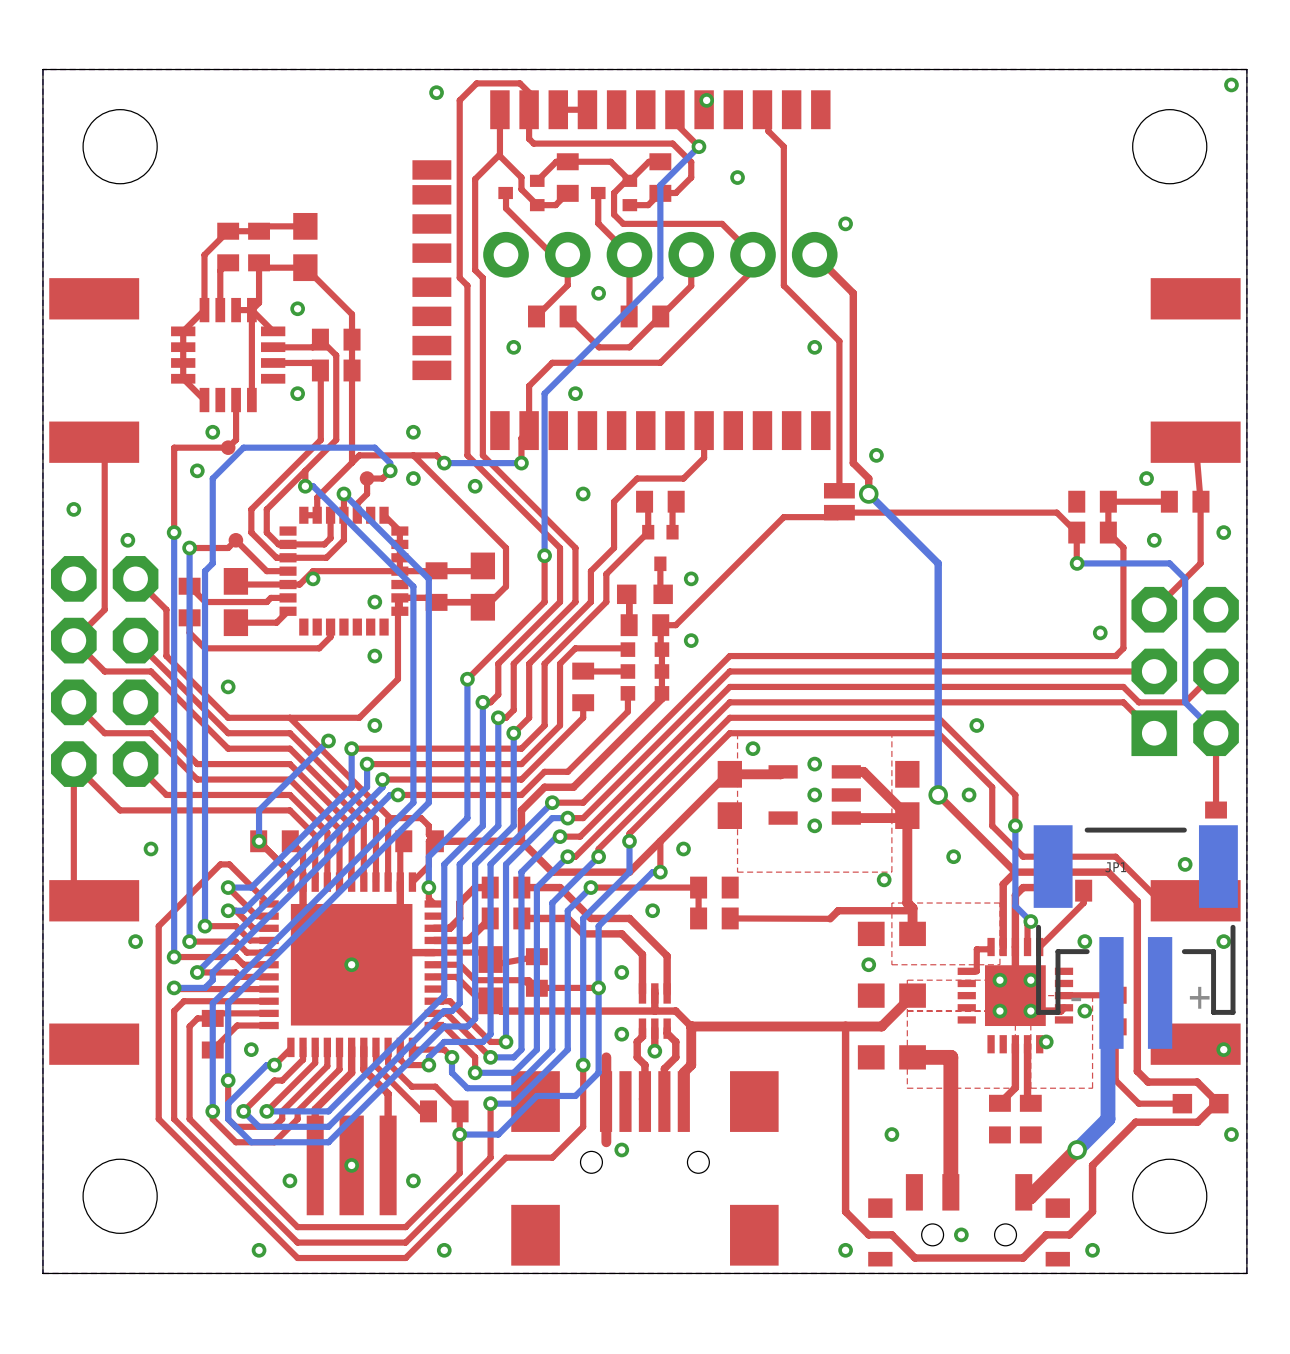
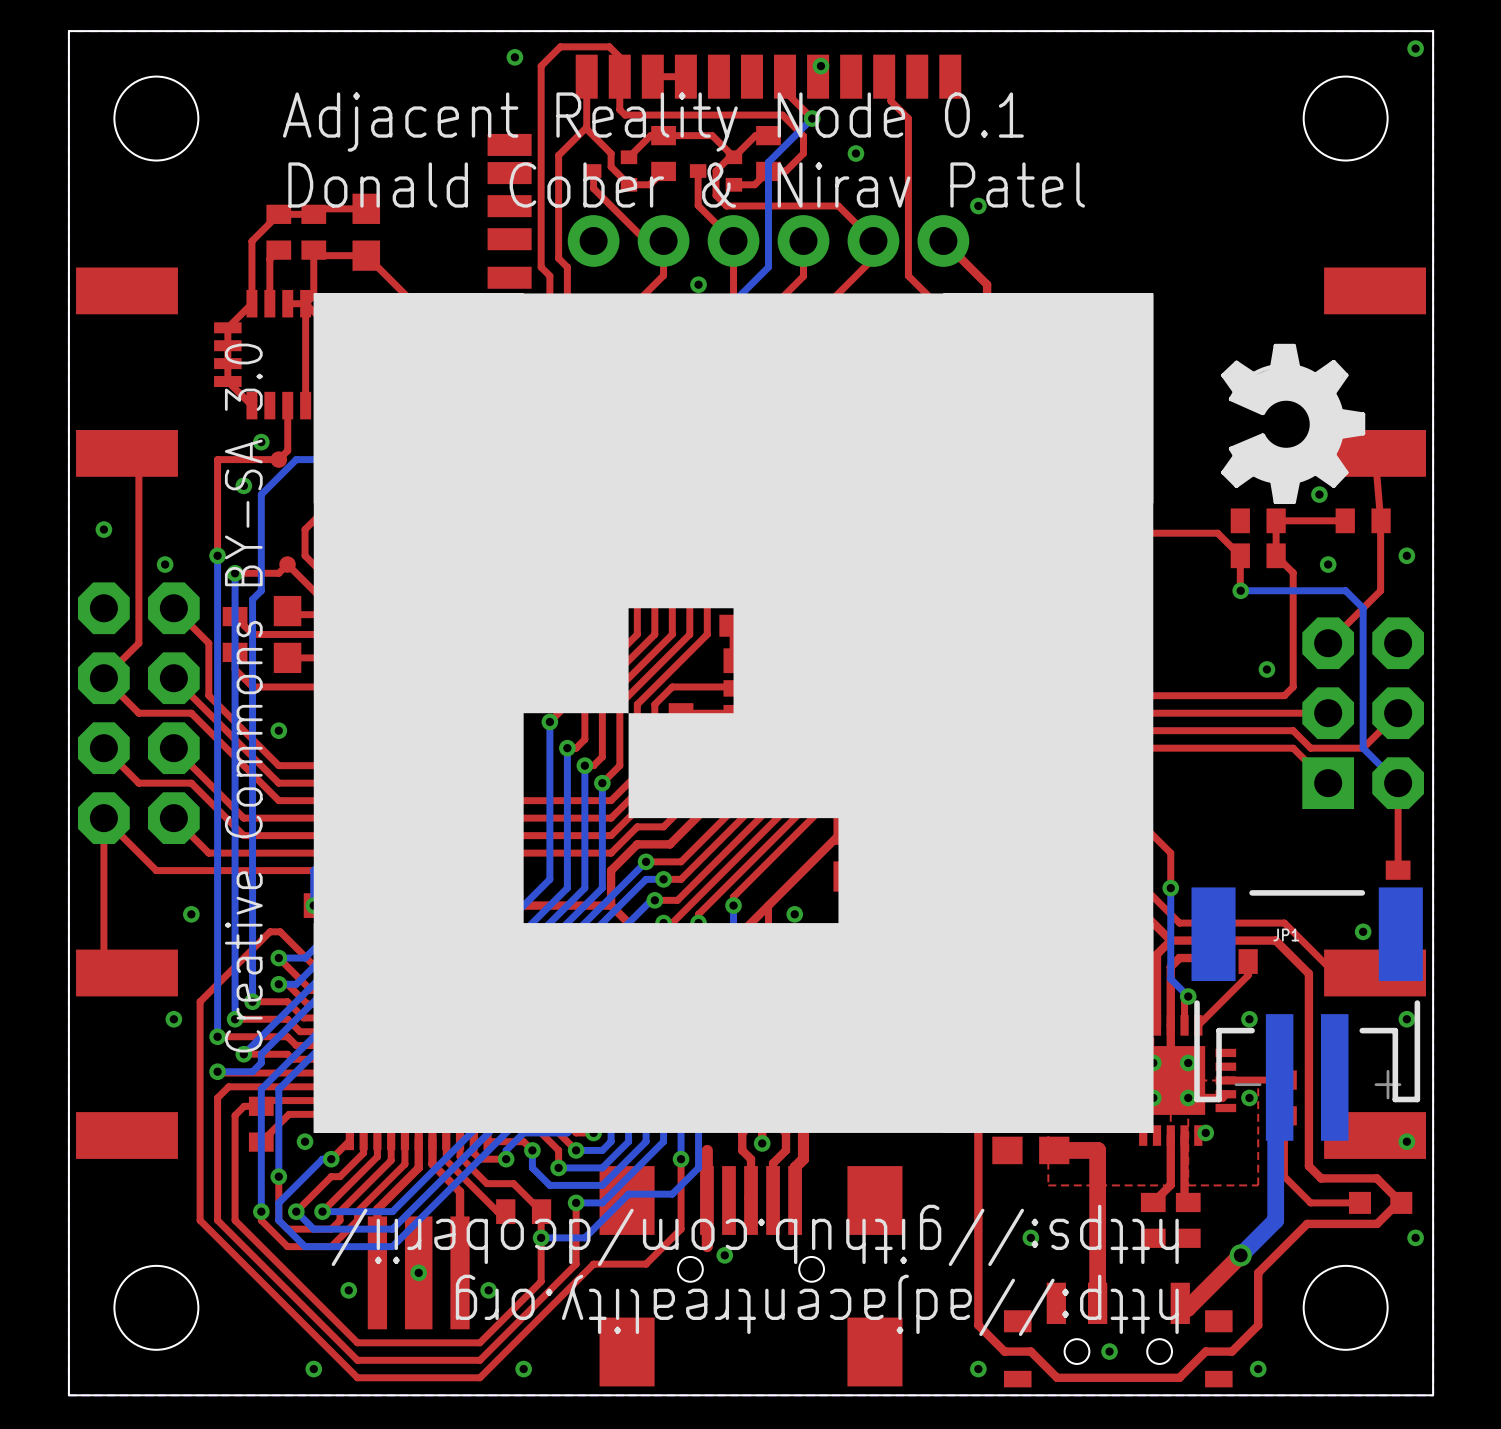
text: none -> Adjacent Reality Node 0.1 (653, 122)
text: none -> Donald Cober & Nirav Patel (686, 185)
drawing: none -> [313, 293, 1154, 1133]
drawing: none -> [1221, 343, 1366, 505]
text: none -> Creative Commons BY-SA 3.0 (243, 698)
text: none -> https://github.com/dcoberii/ (755, 1235)
text: none -> http://adjacentreality.org (817, 1305)

